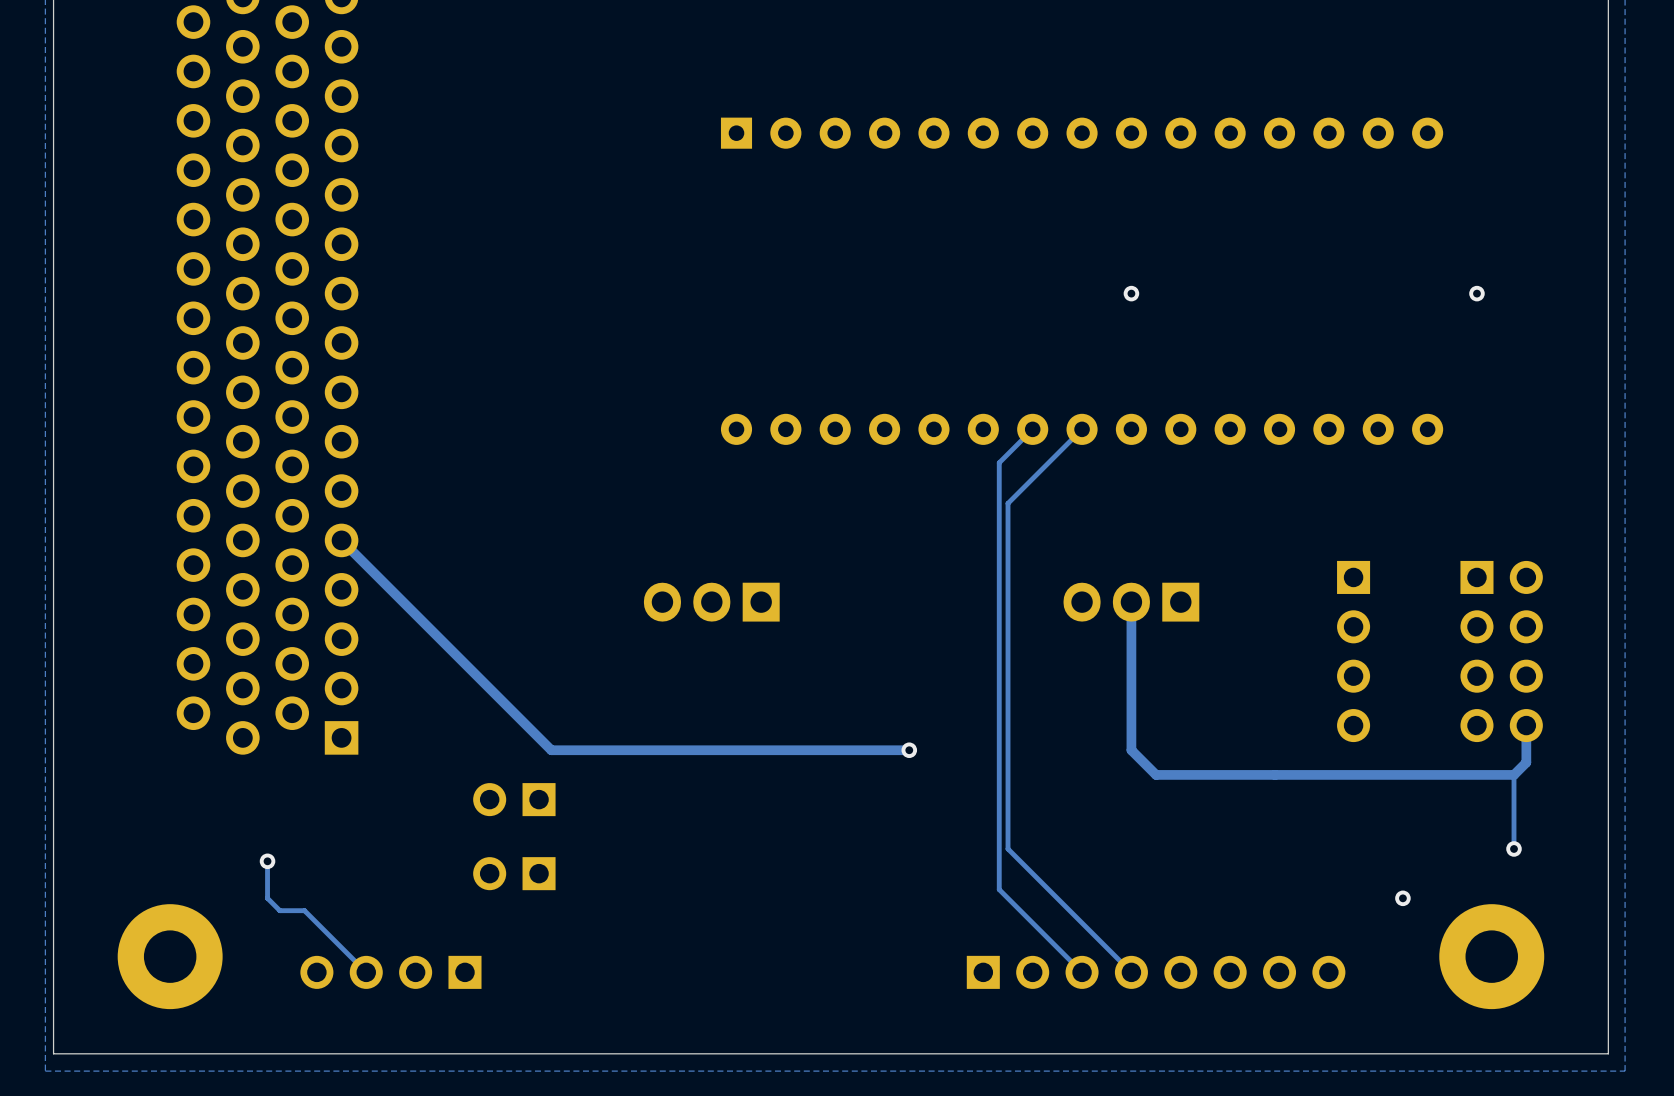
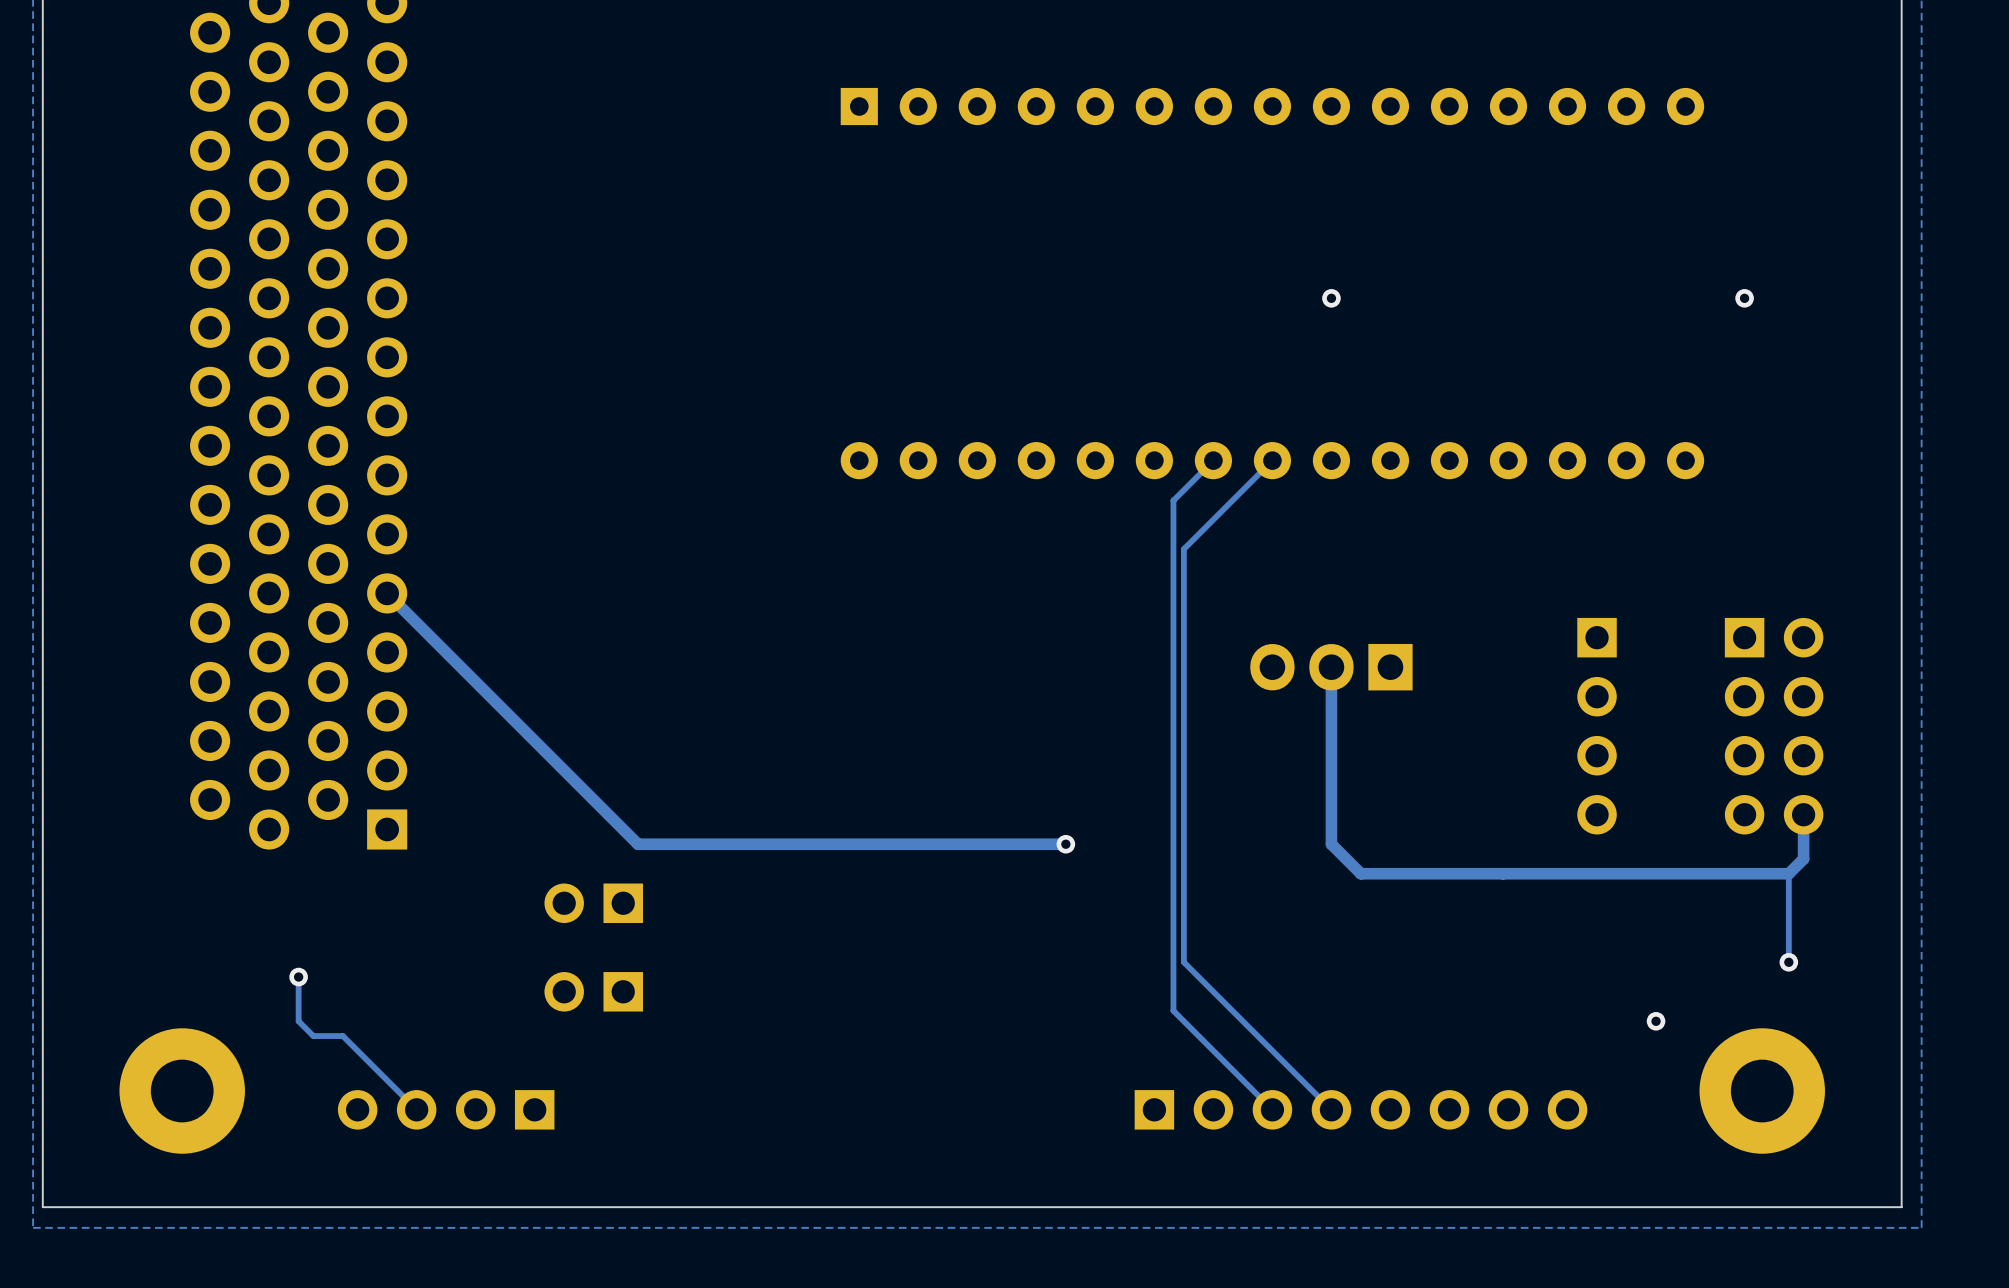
part: (711, 602) -> none

